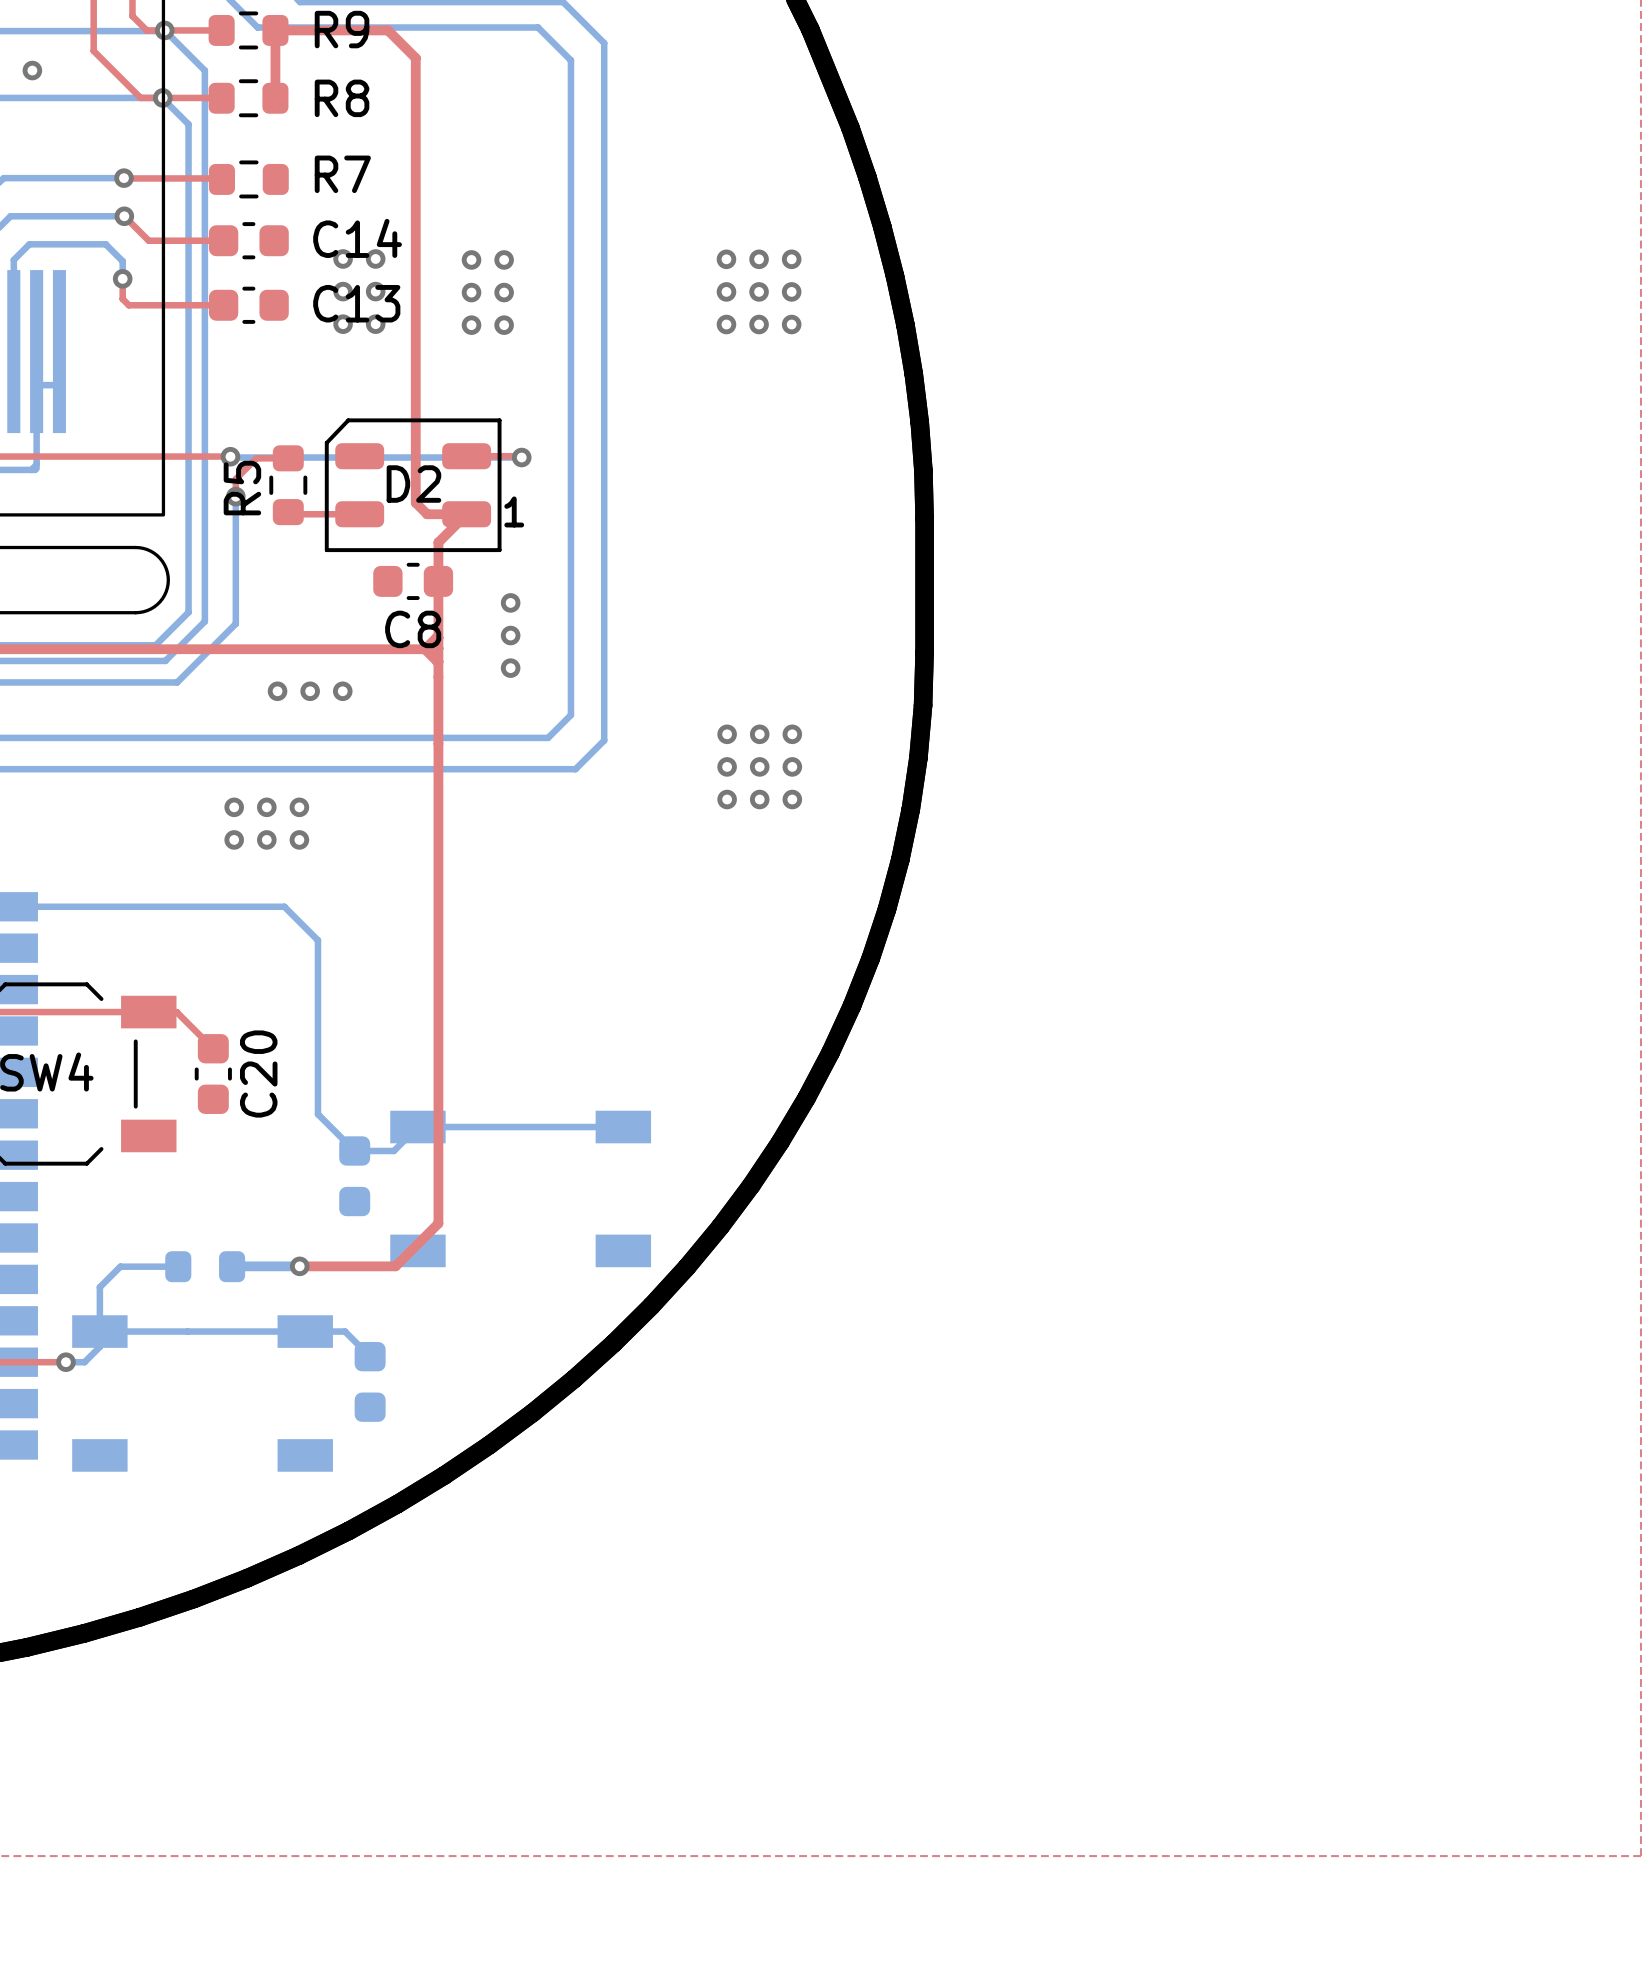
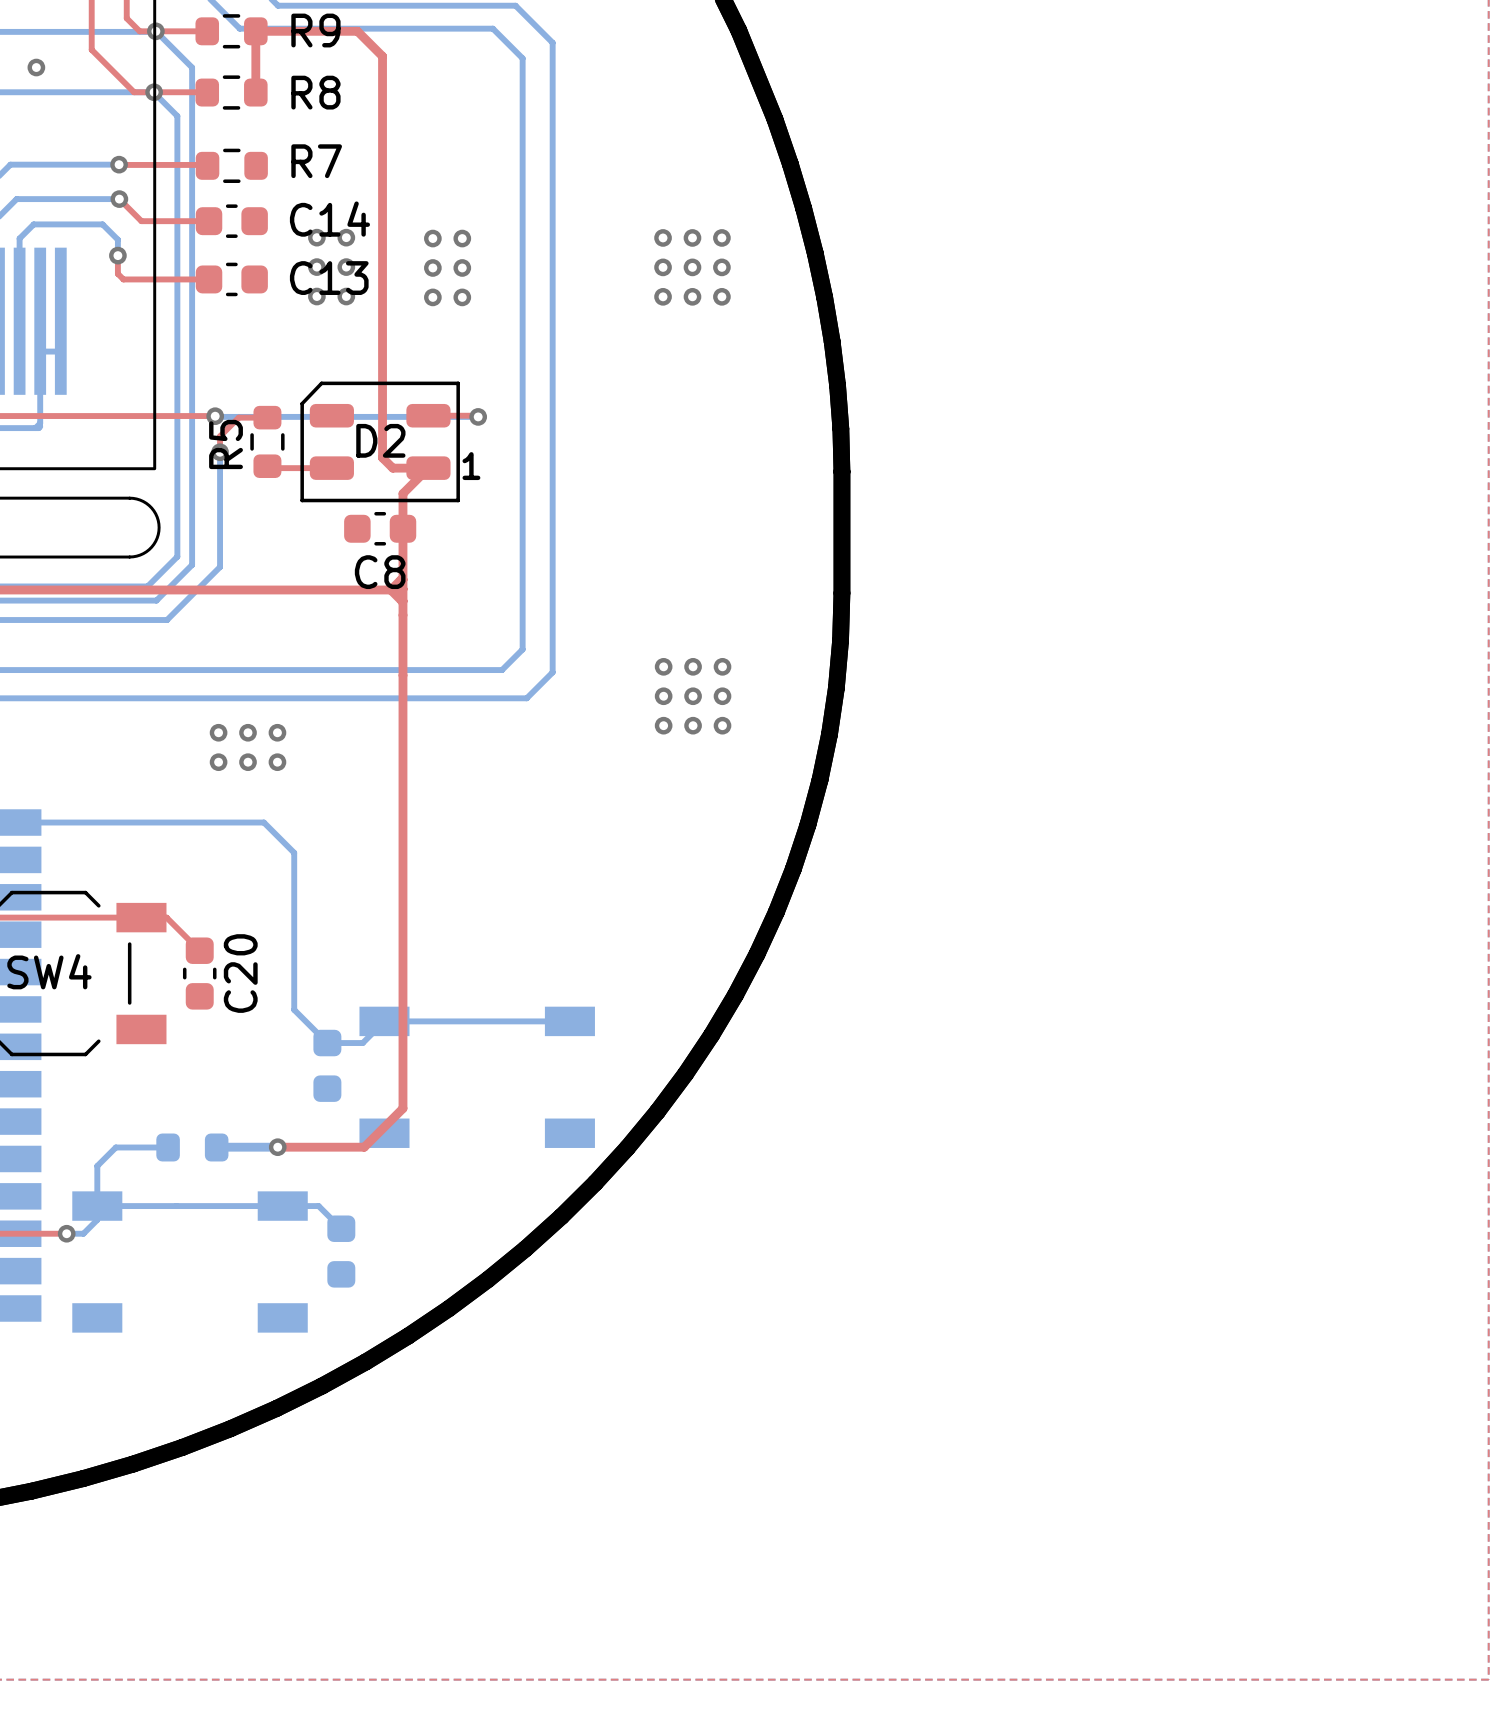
via: (510, 602) -> none
via: (510, 635) -> none
via: (510, 668) -> none
via: (277, 691) -> none
via: (310, 691) -> none
via: (342, 691) -> none

